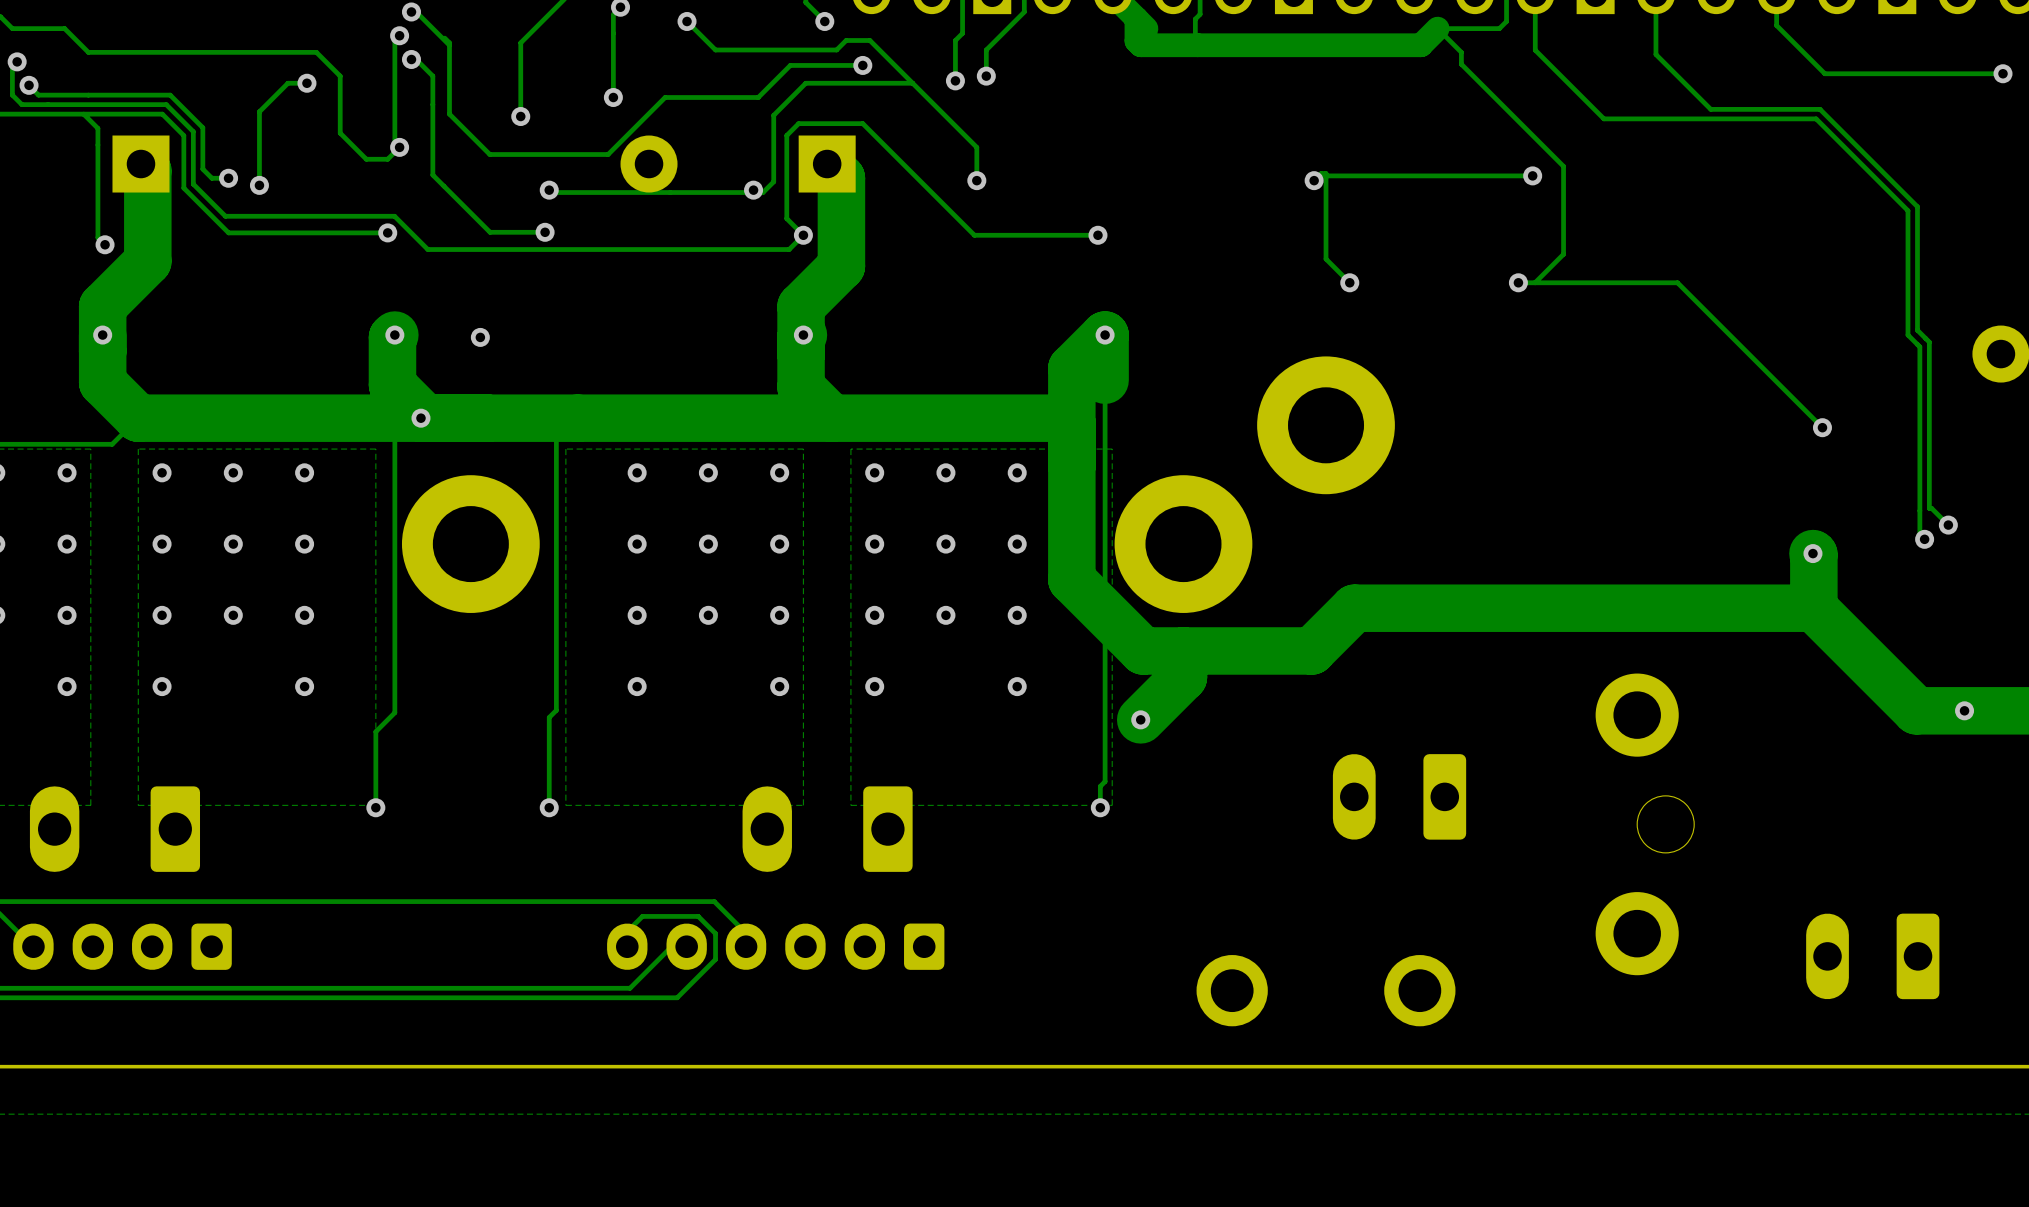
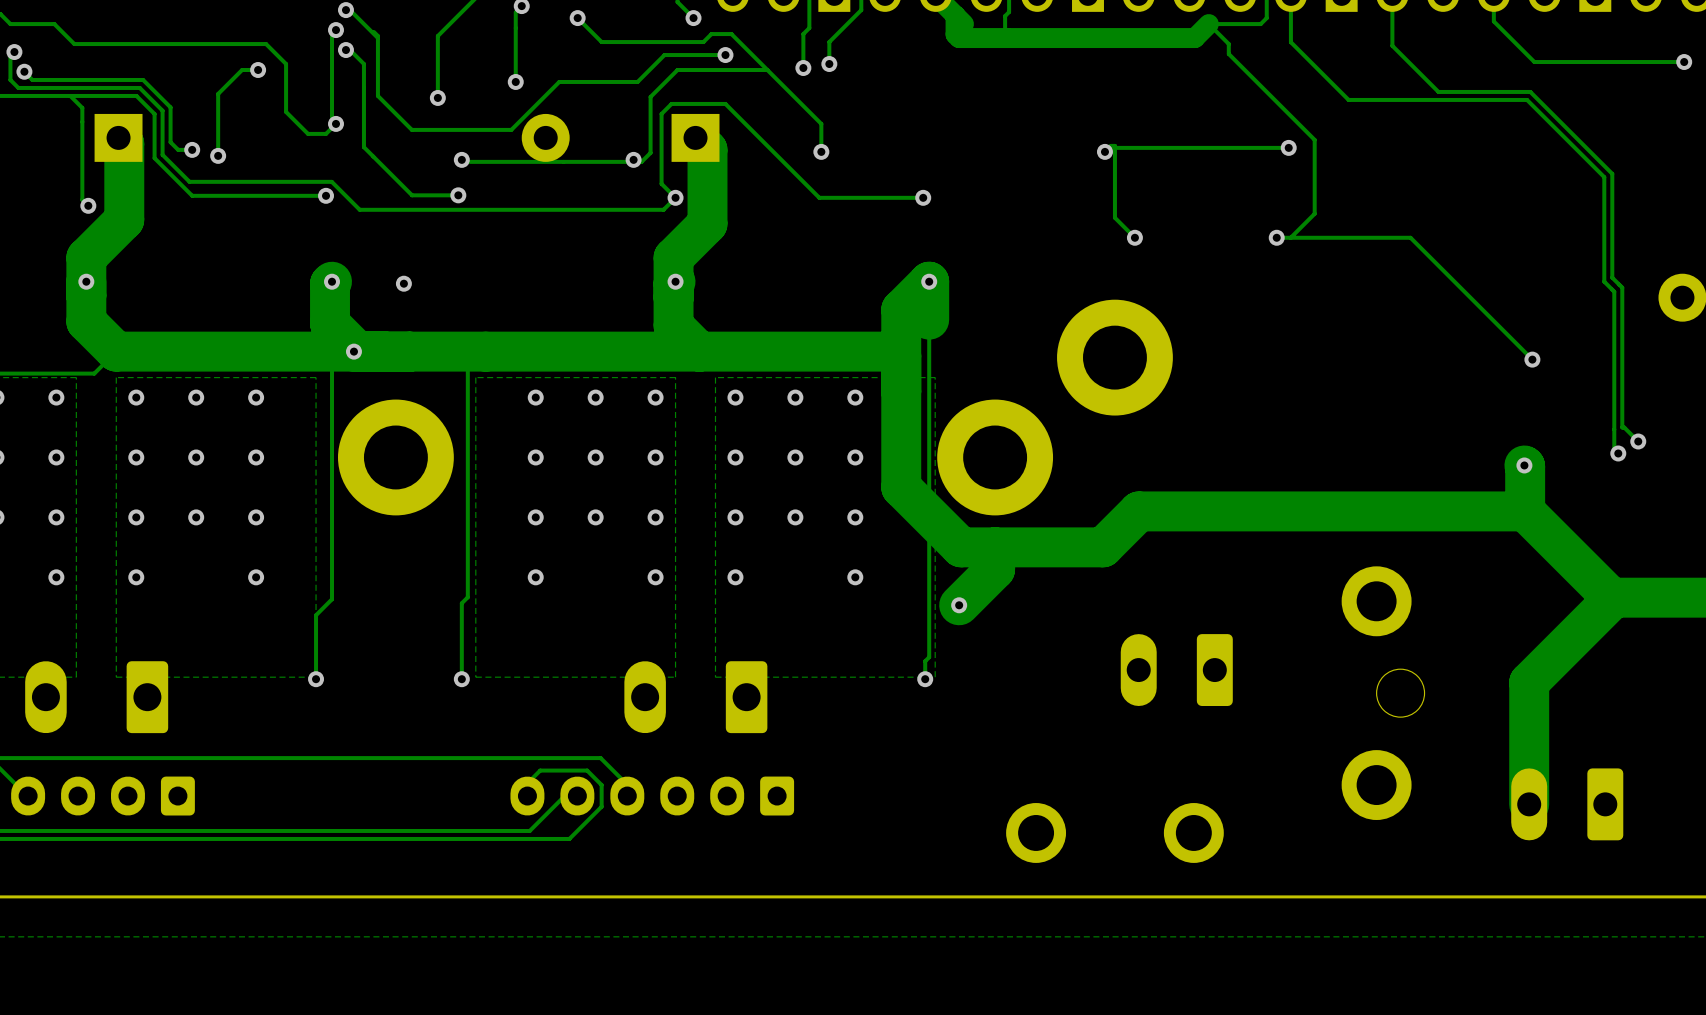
track: none -> (1611, 597) (1611, 600) (1529, 682) (1529, 804)
via: (1964, 710) -> none
part footprint: [1806, 913, 1940, 1000] -> [1511, 768, 1624, 841]

